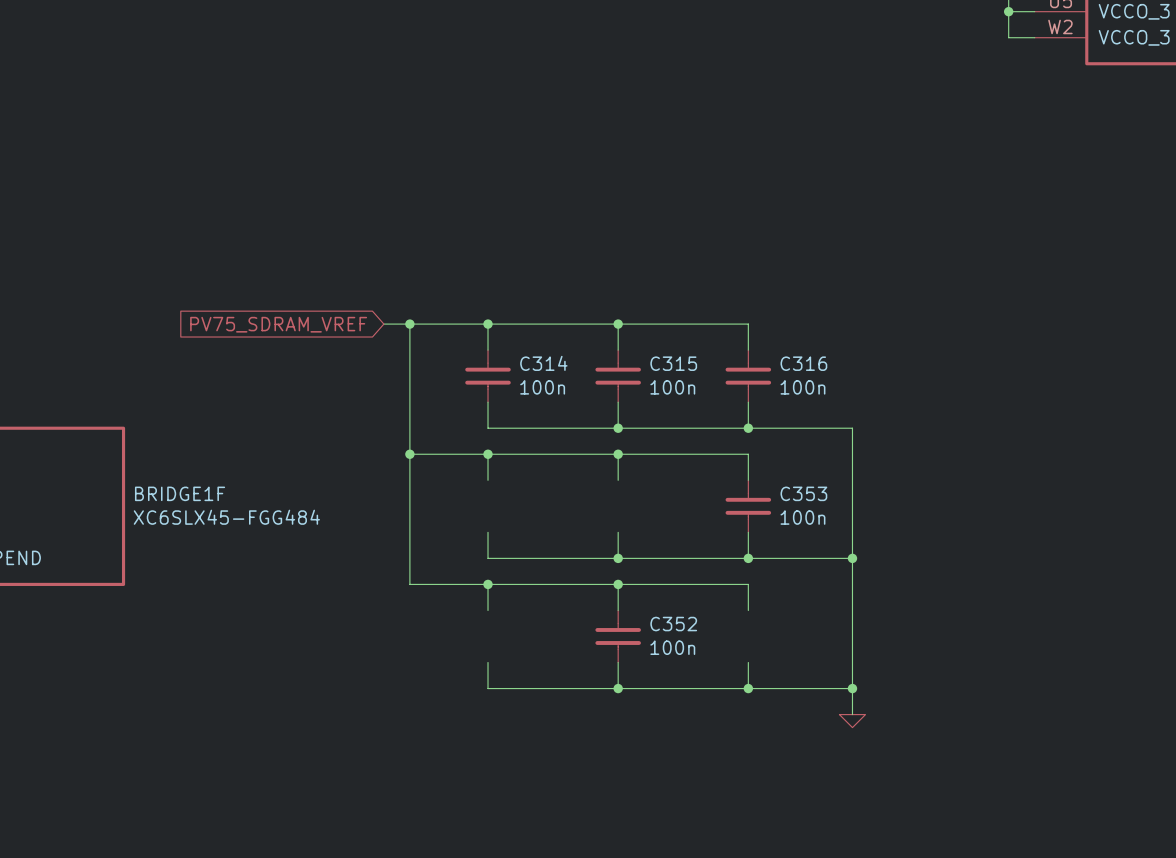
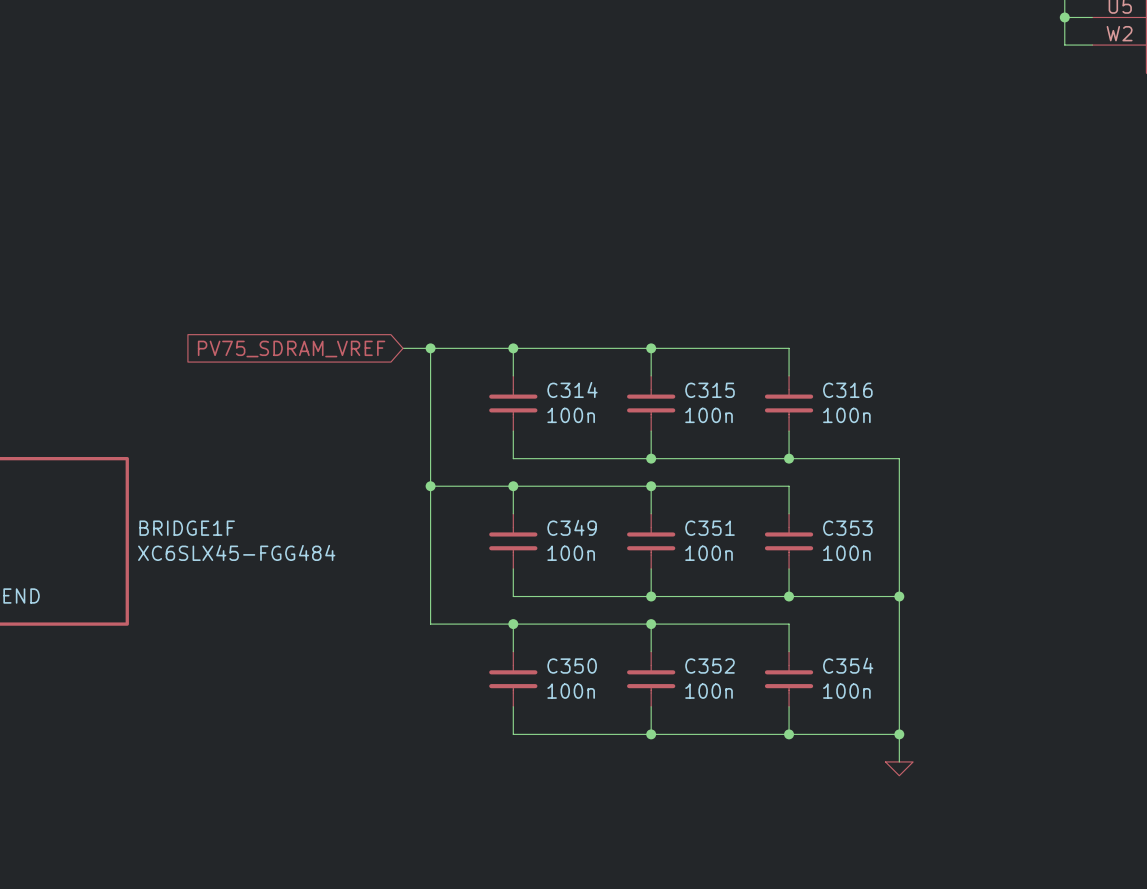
C349: none -> 100n (513, 541)
C351: none -> 100n (651, 541)
C350: none -> 100n (513, 679)
C354: none -> 100n (789, 679)

